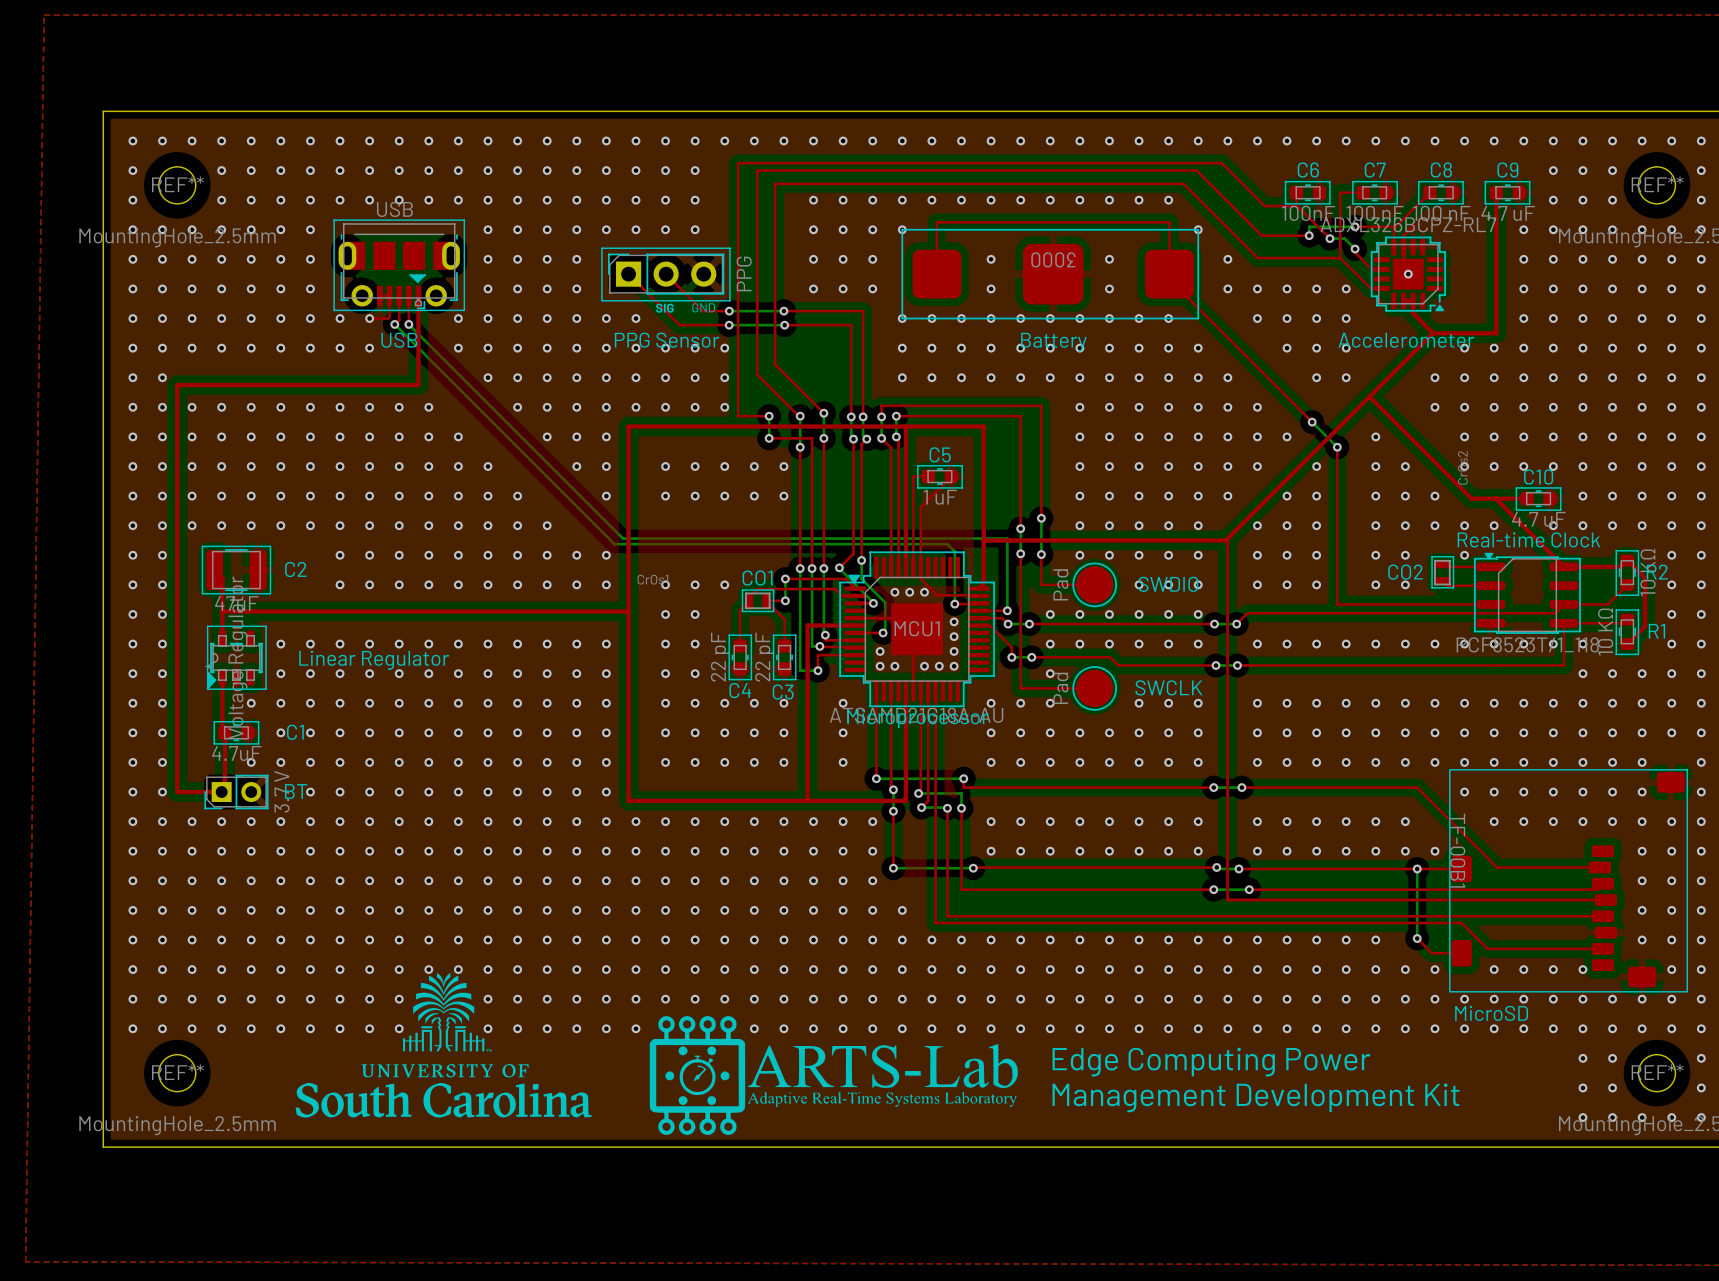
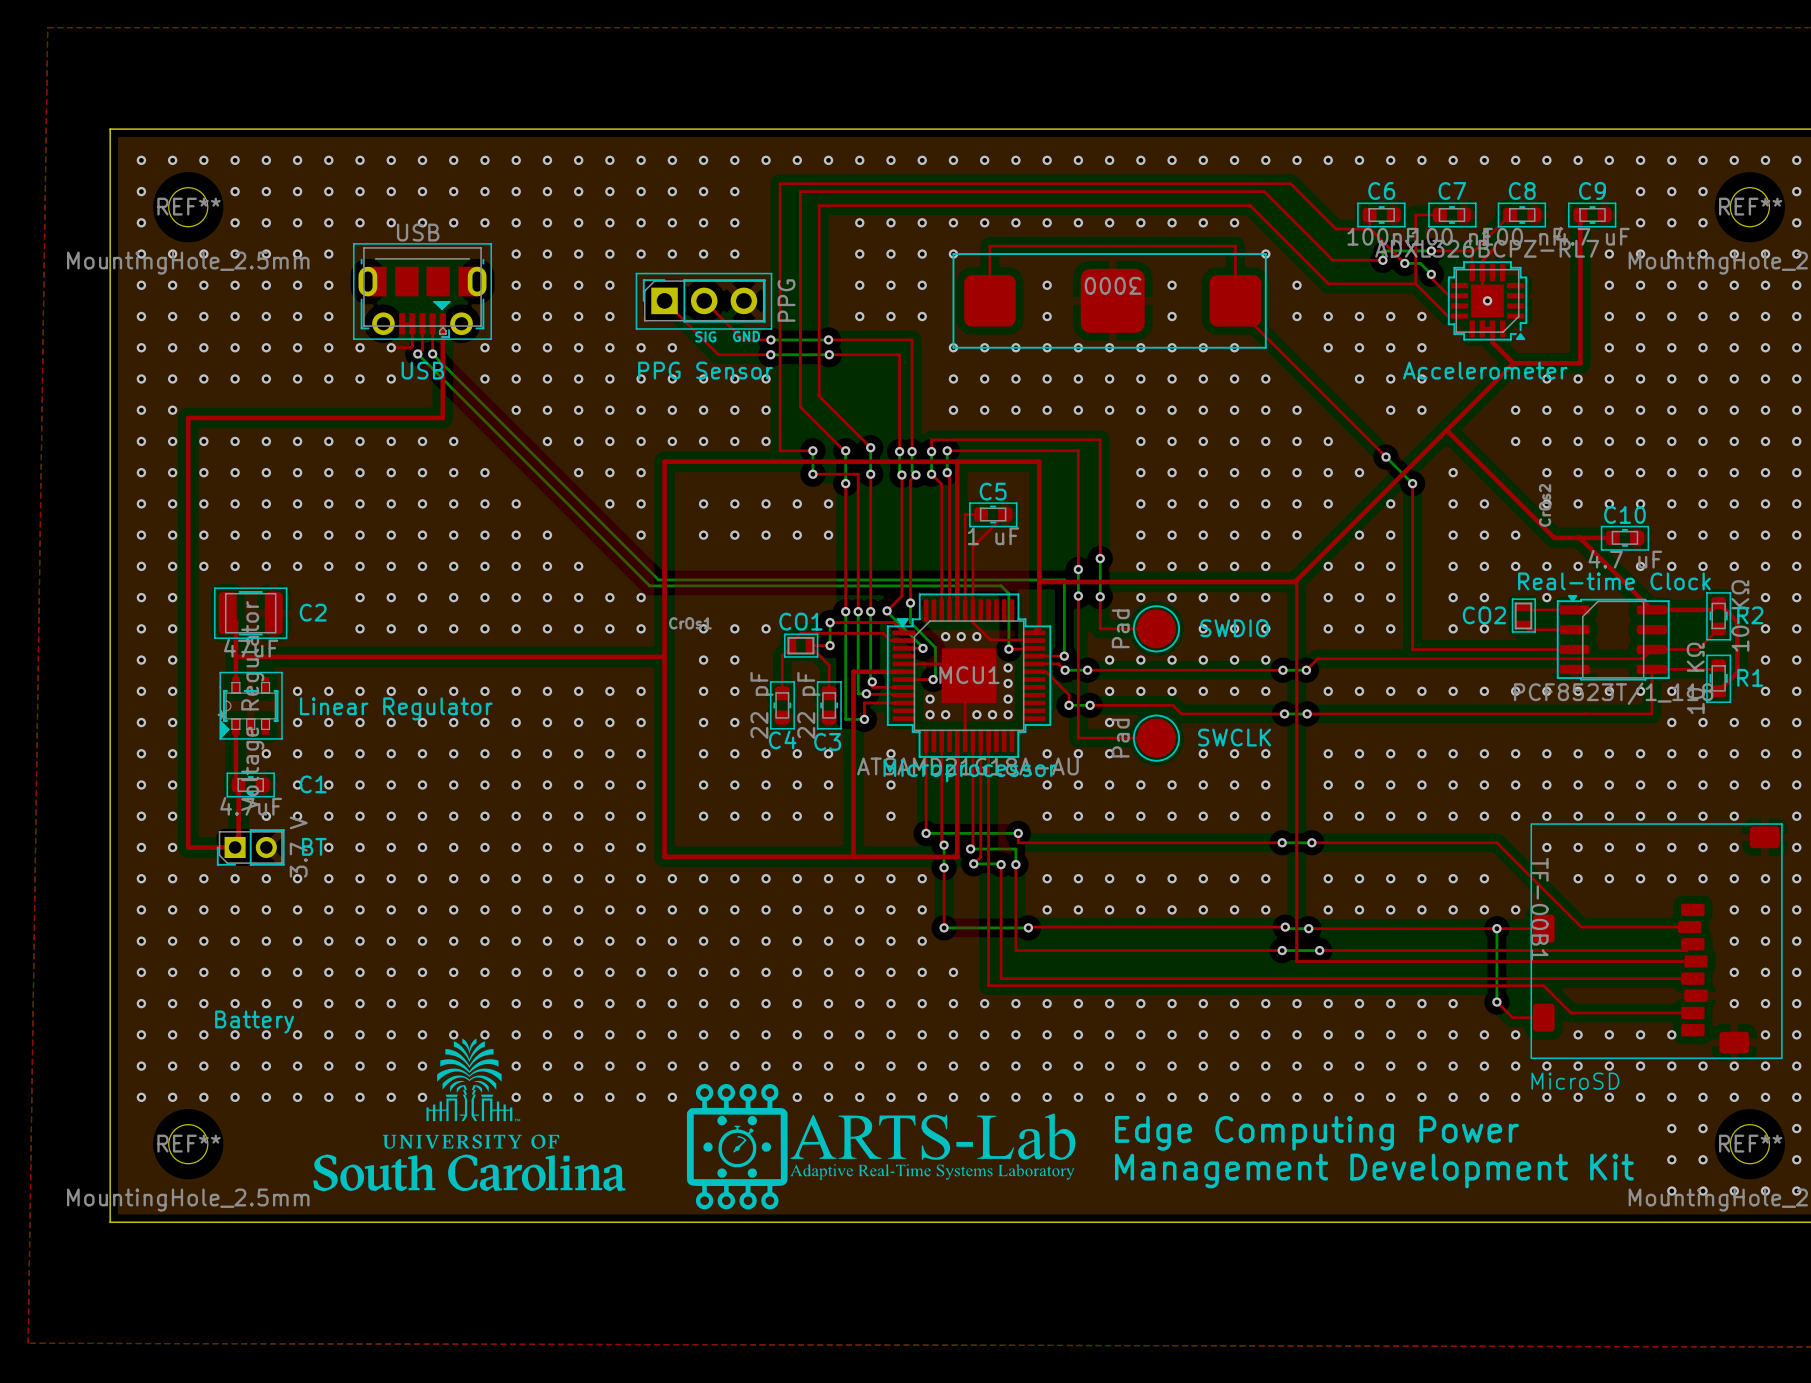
Battery name position: Battery (1053, 342) -> Battery (254, 1022)

